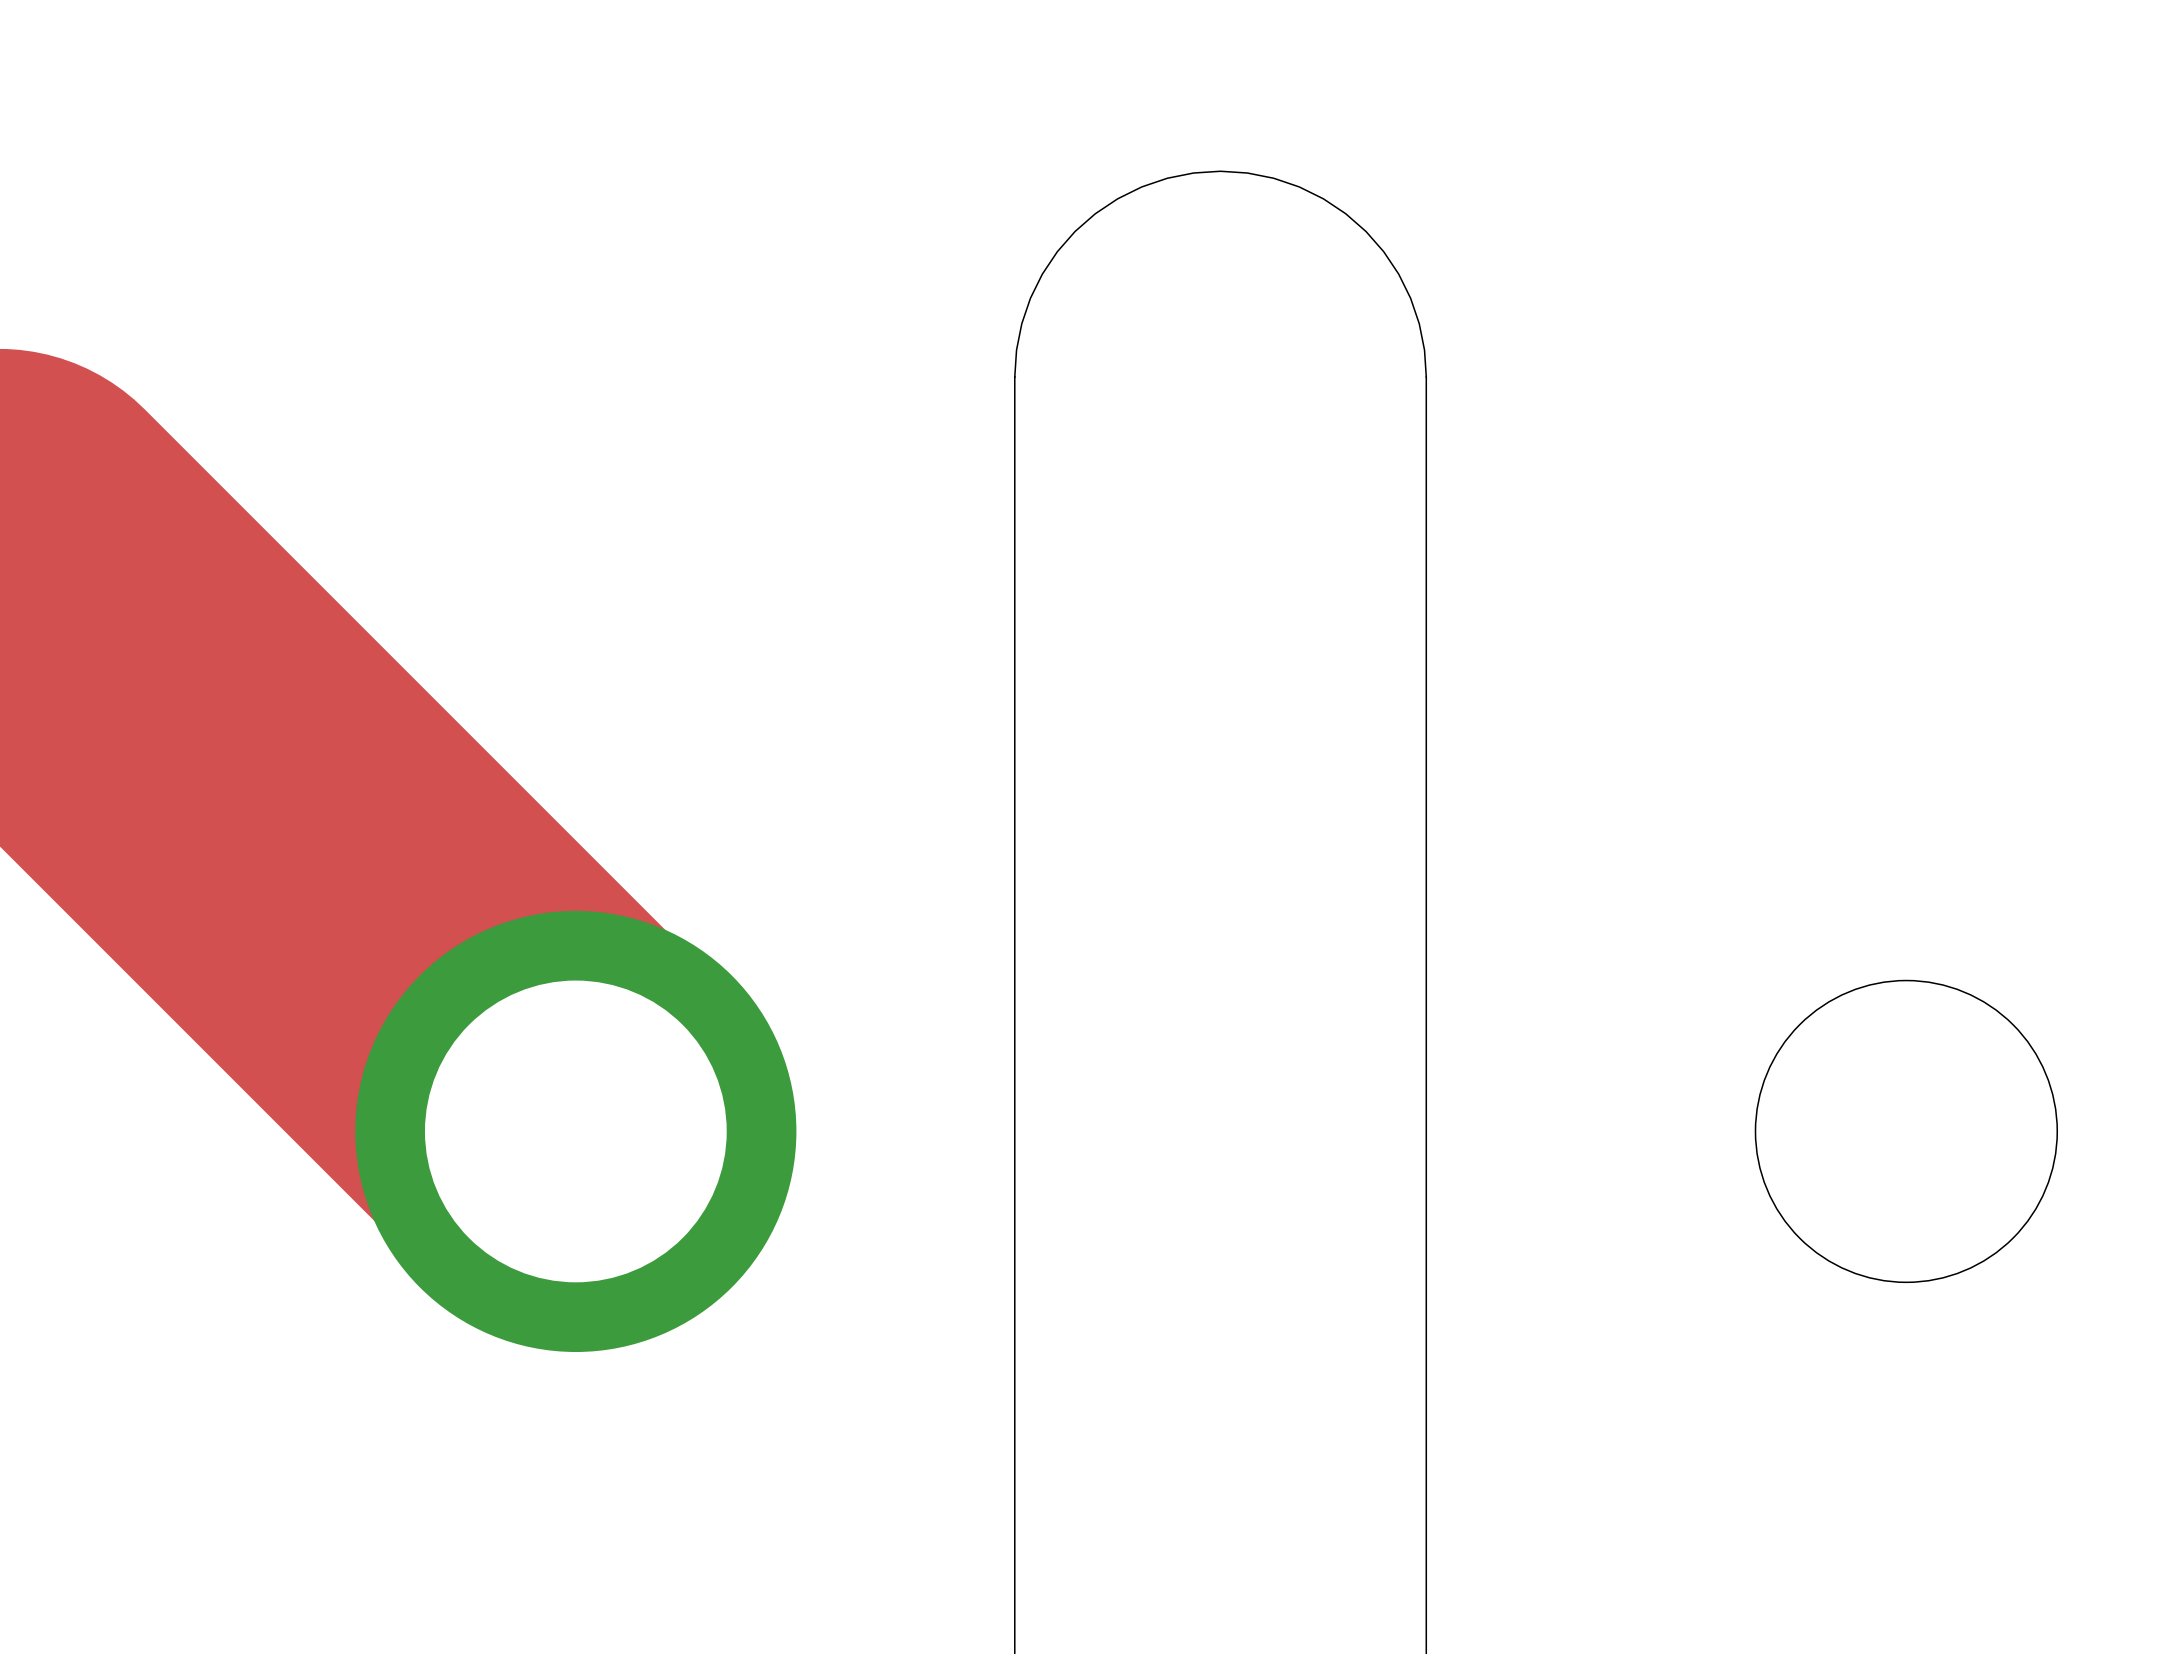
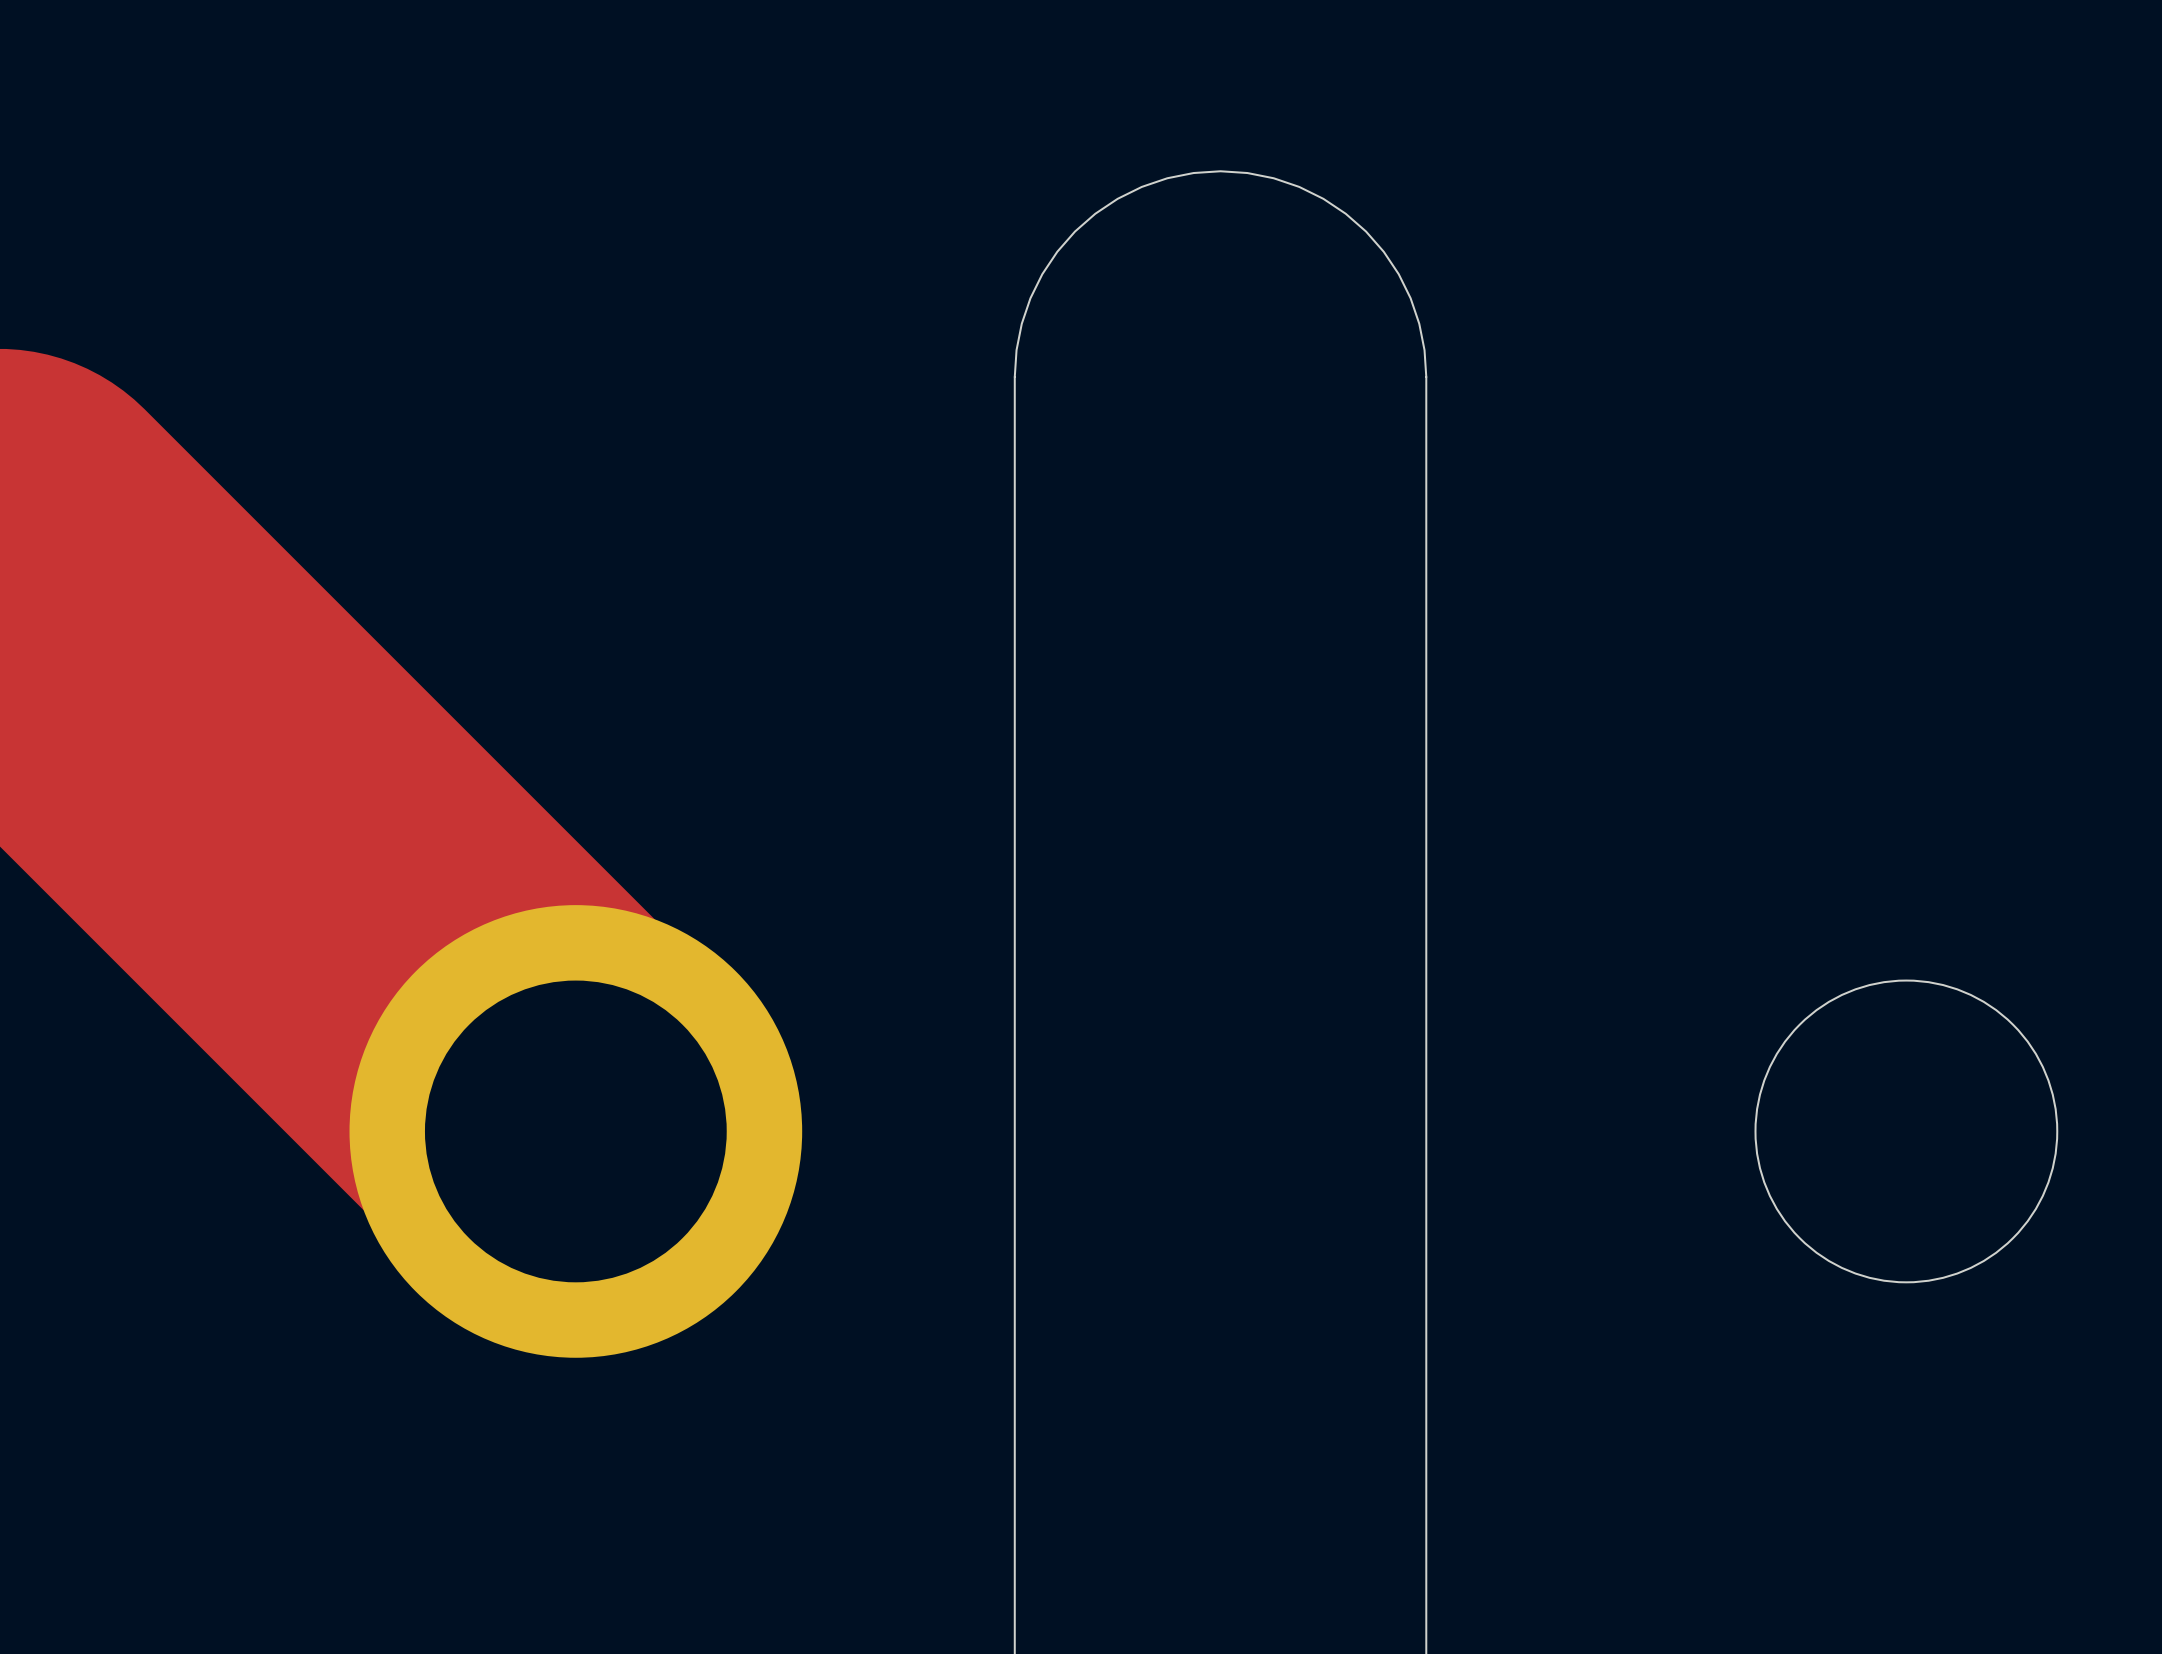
part footprint: [355, 910, 797, 1353] -> [349, 905, 803, 1358]

